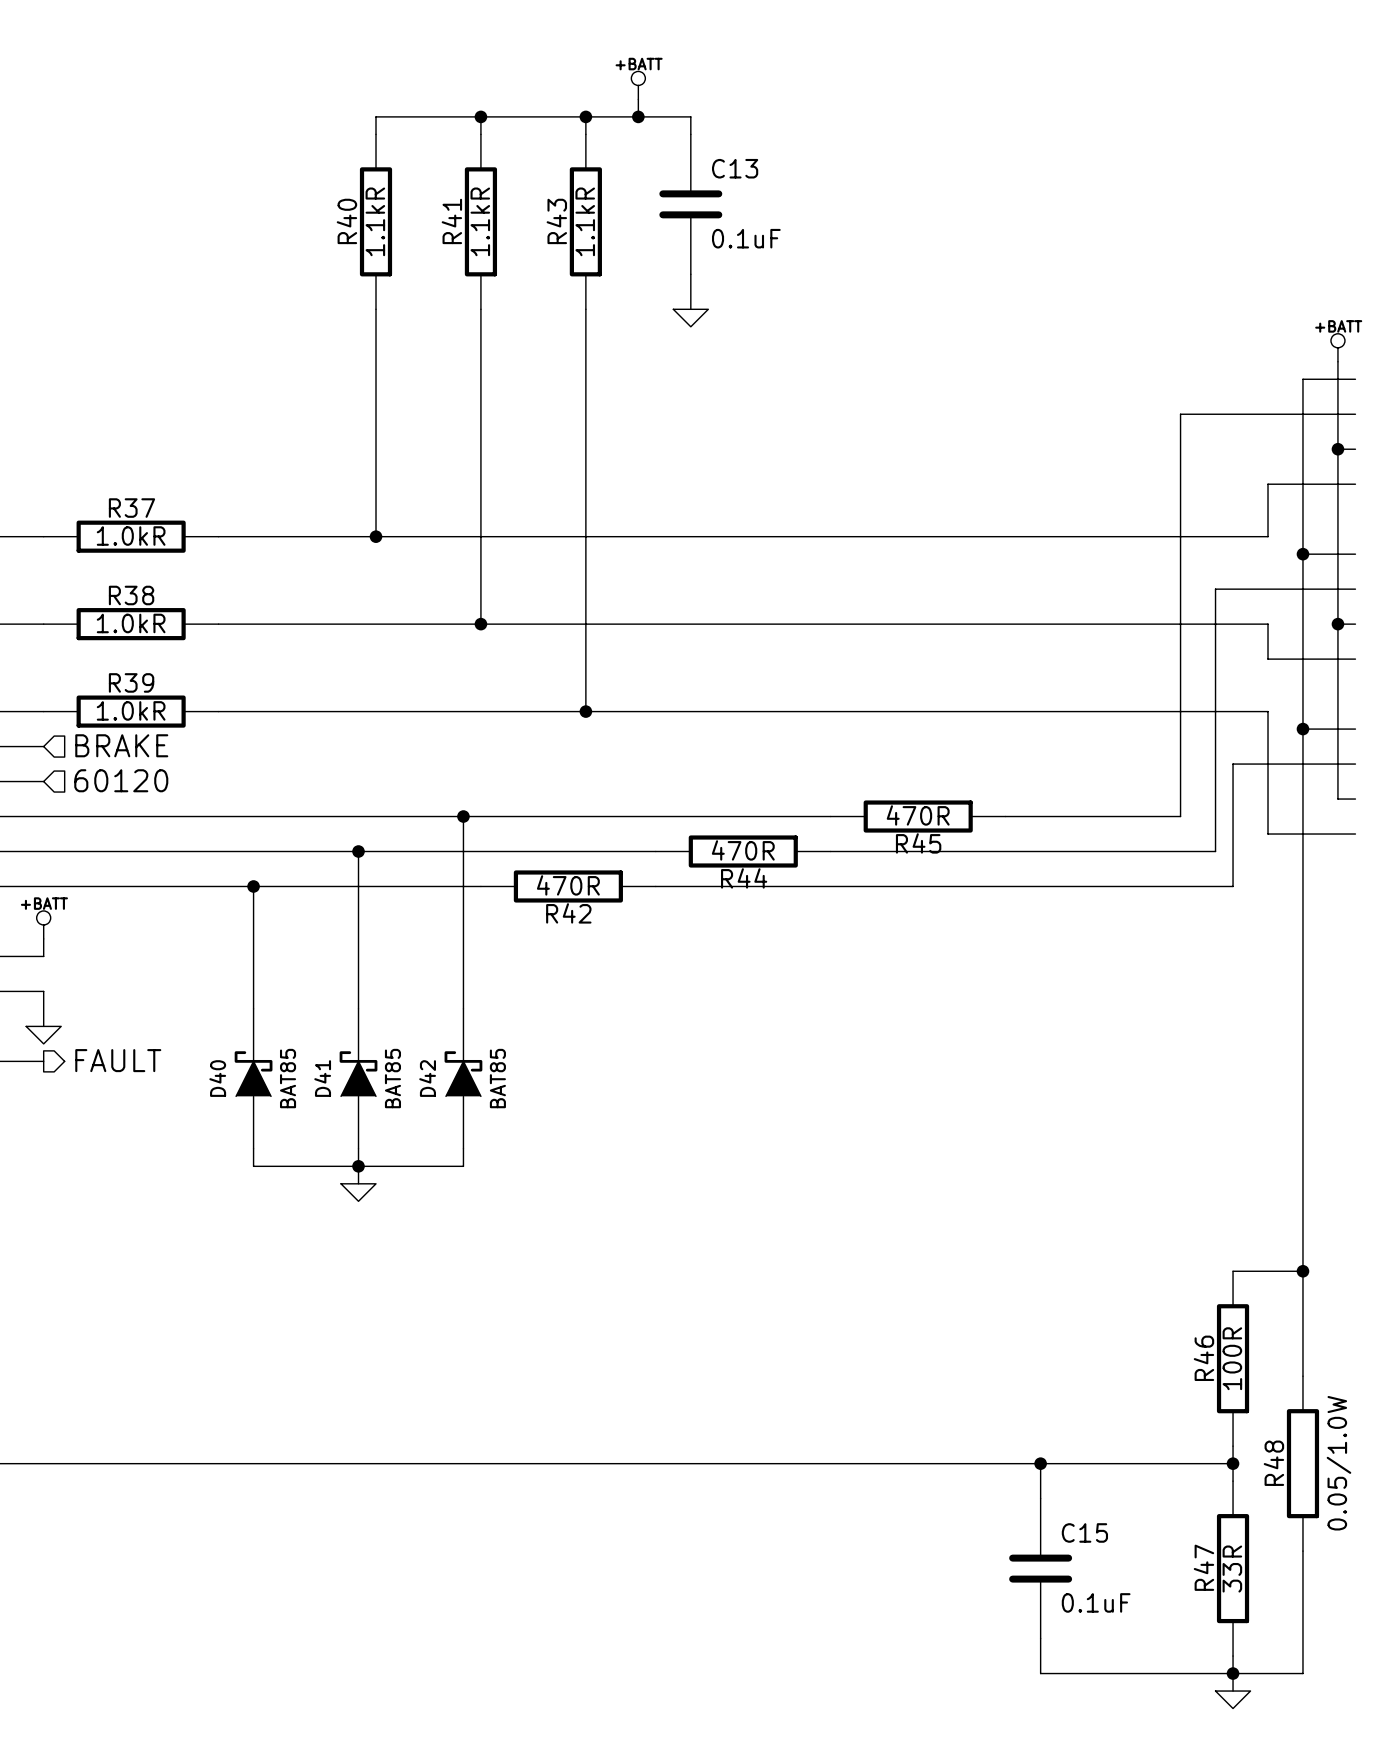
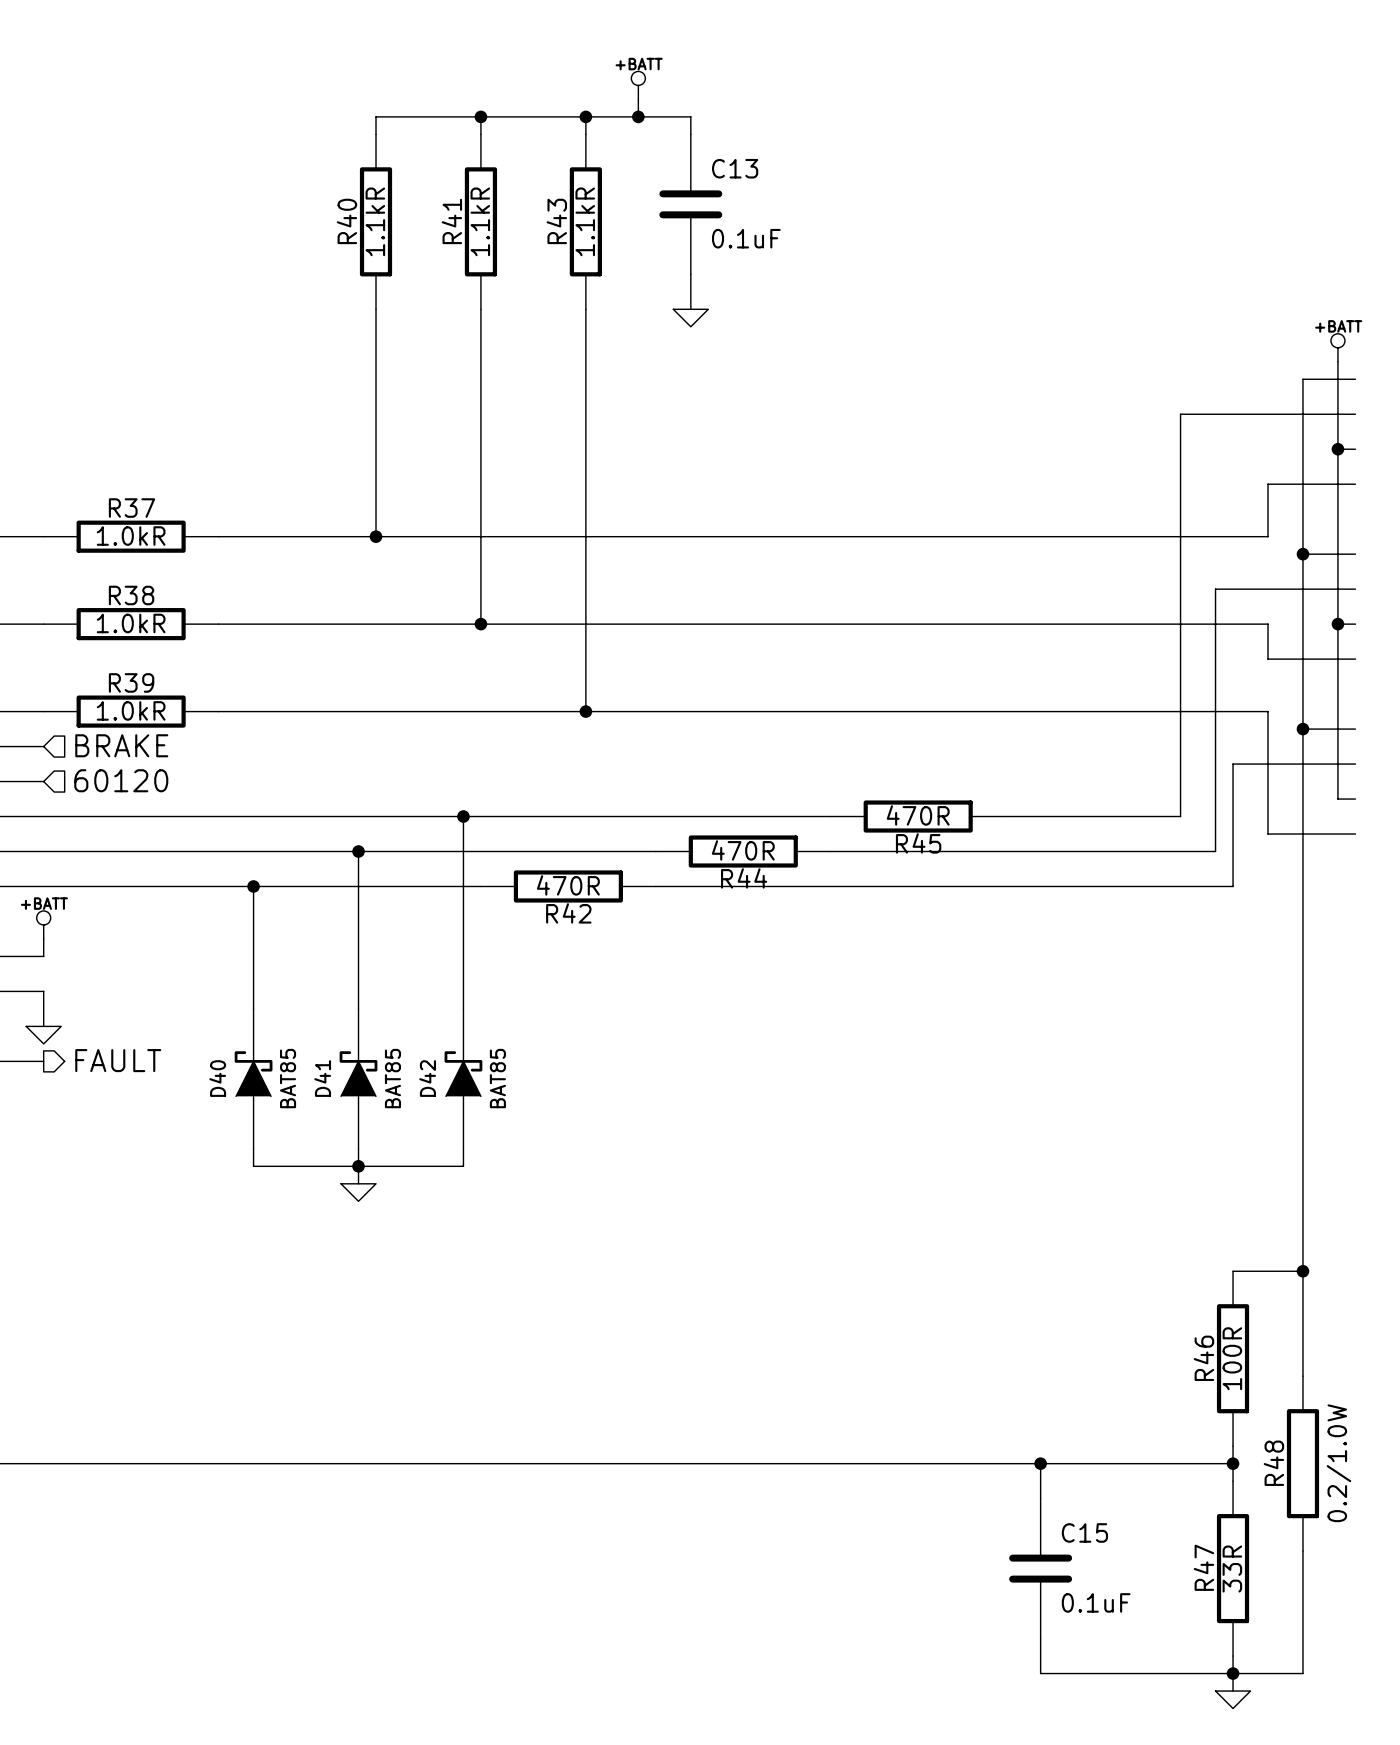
R48 value: 0.05/1.0W (1338, 1463) -> 0.2/1.0W (1338, 1463)

